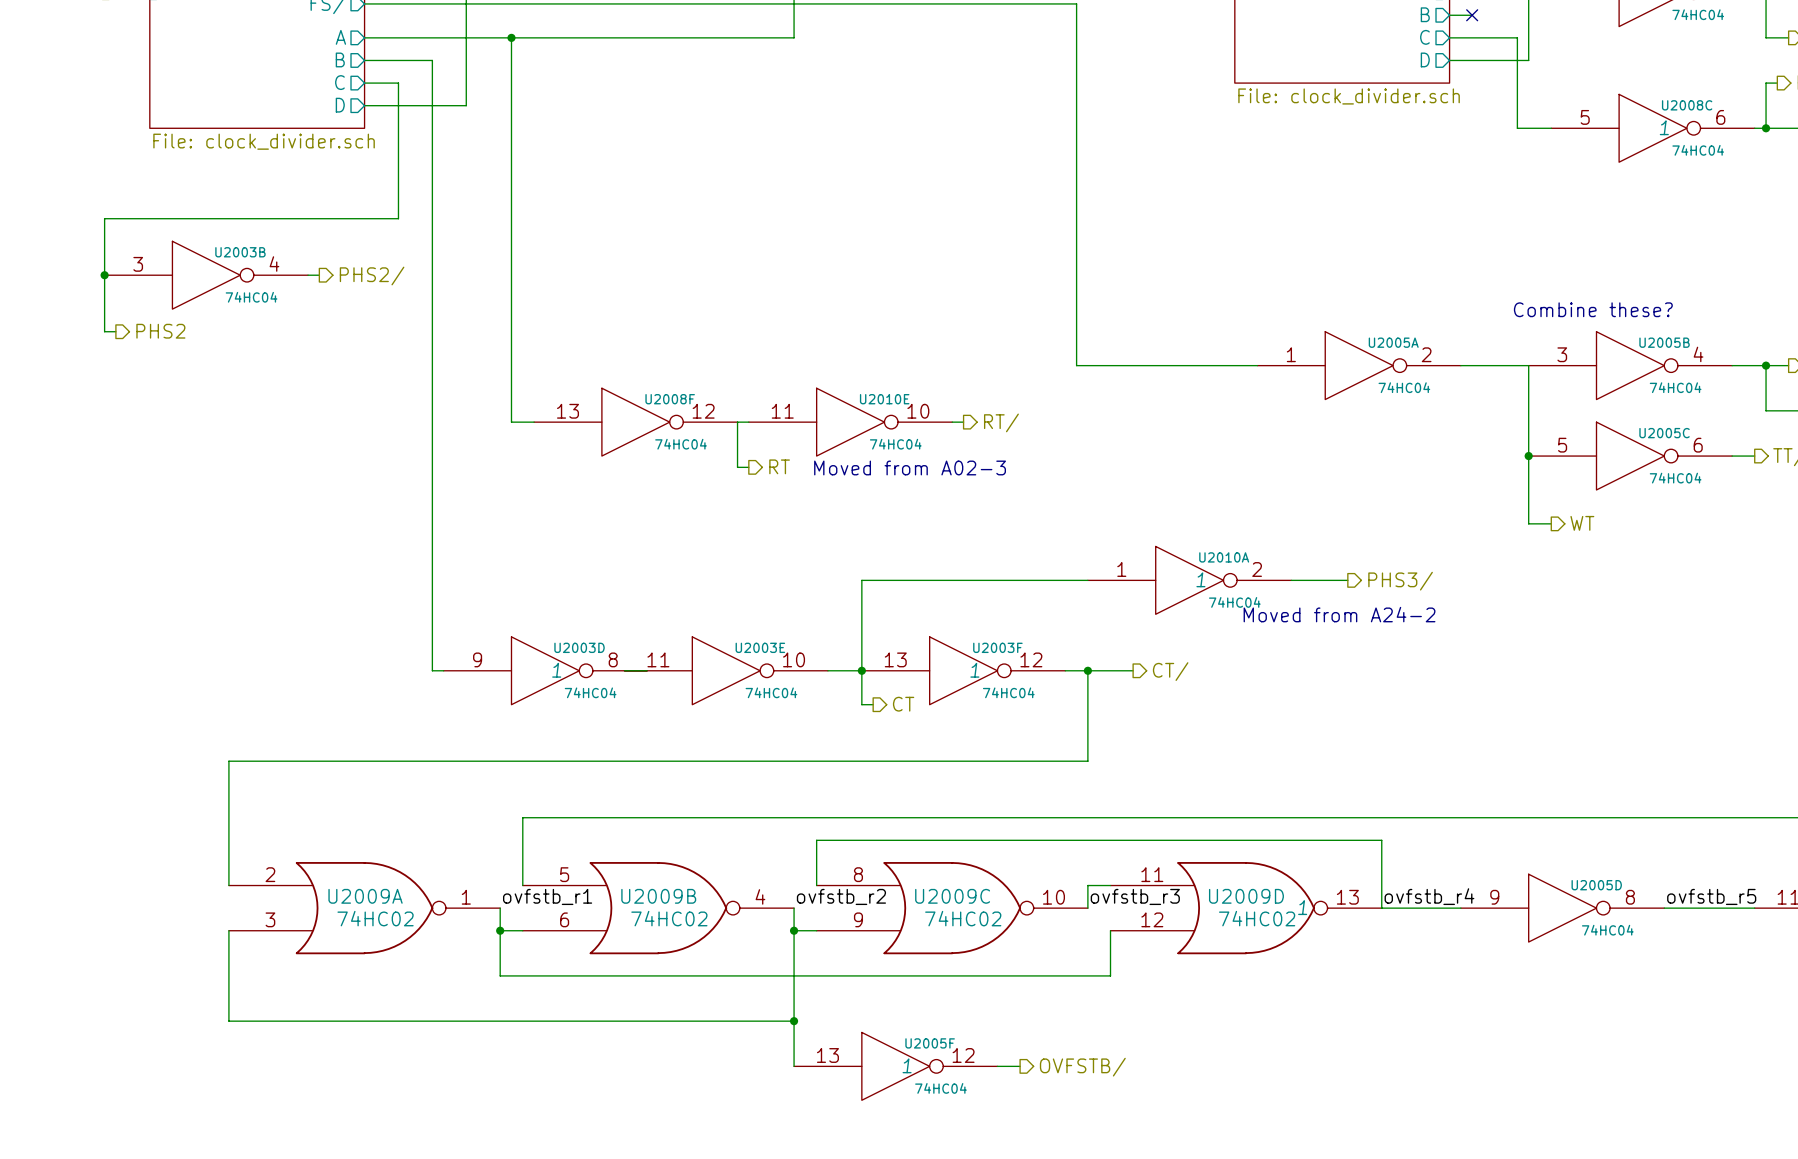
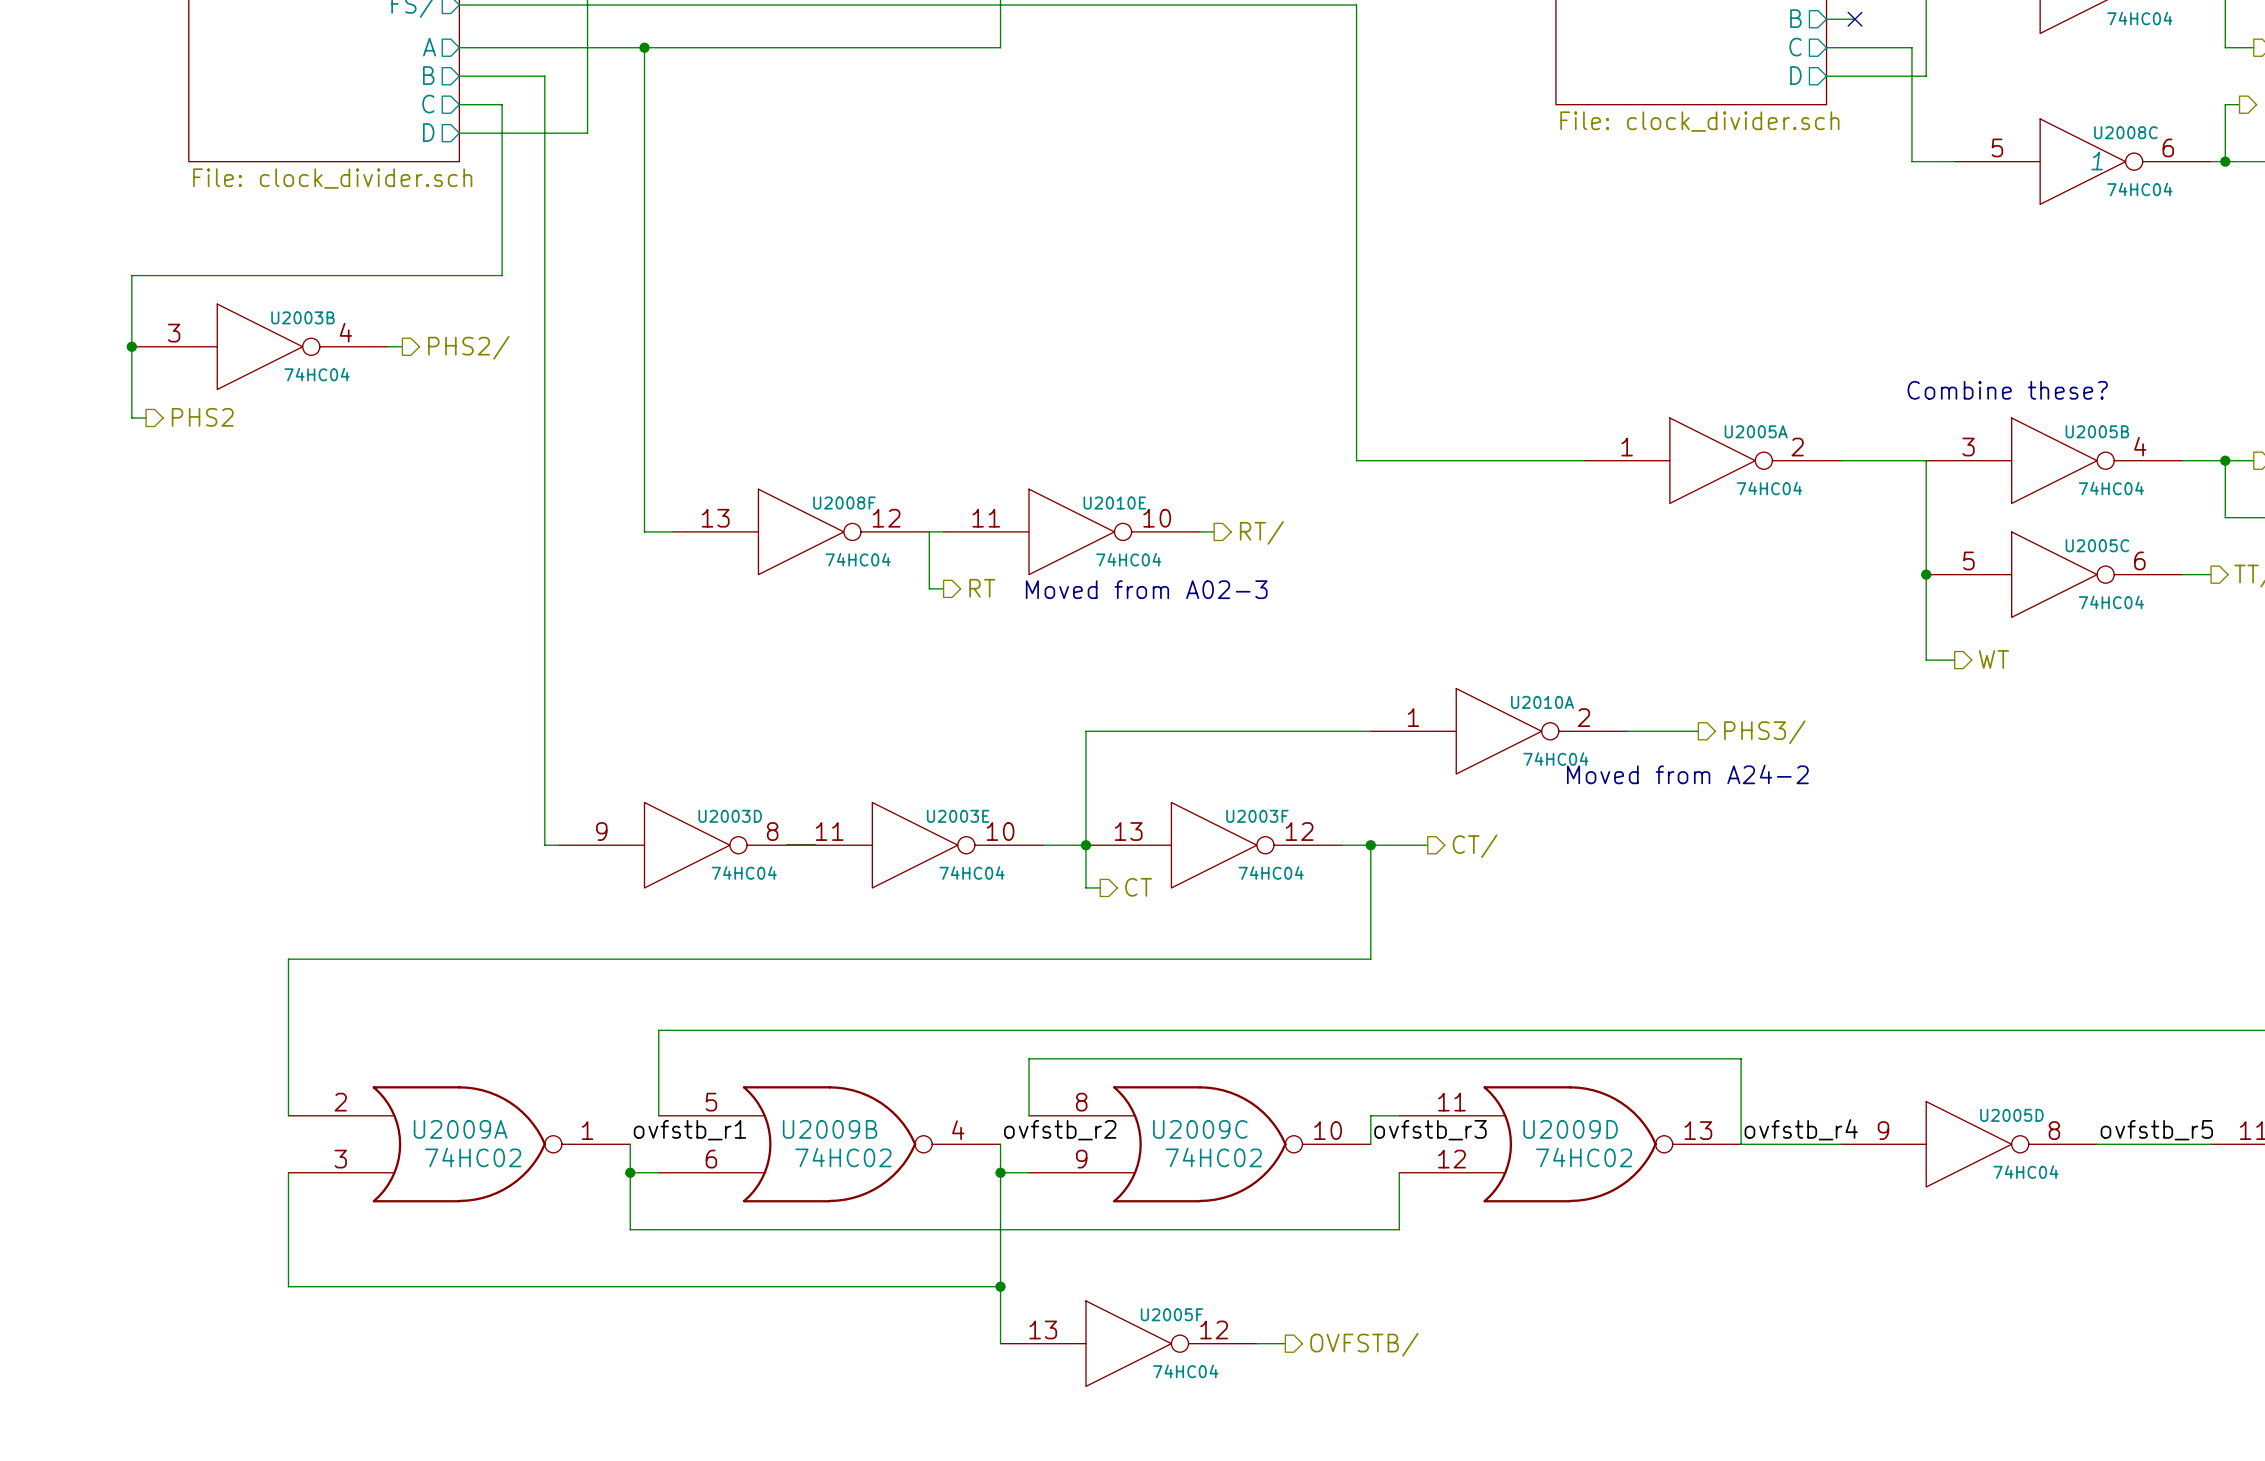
U2010A text: 1 (1200, 579) -> none
U2003D text: 1 (556, 670) -> none
U2003F text: 1 (974, 670) -> none
U2009D text: 1 (1302, 907) -> none
U2005F text: 1 (907, 1065) -> none

